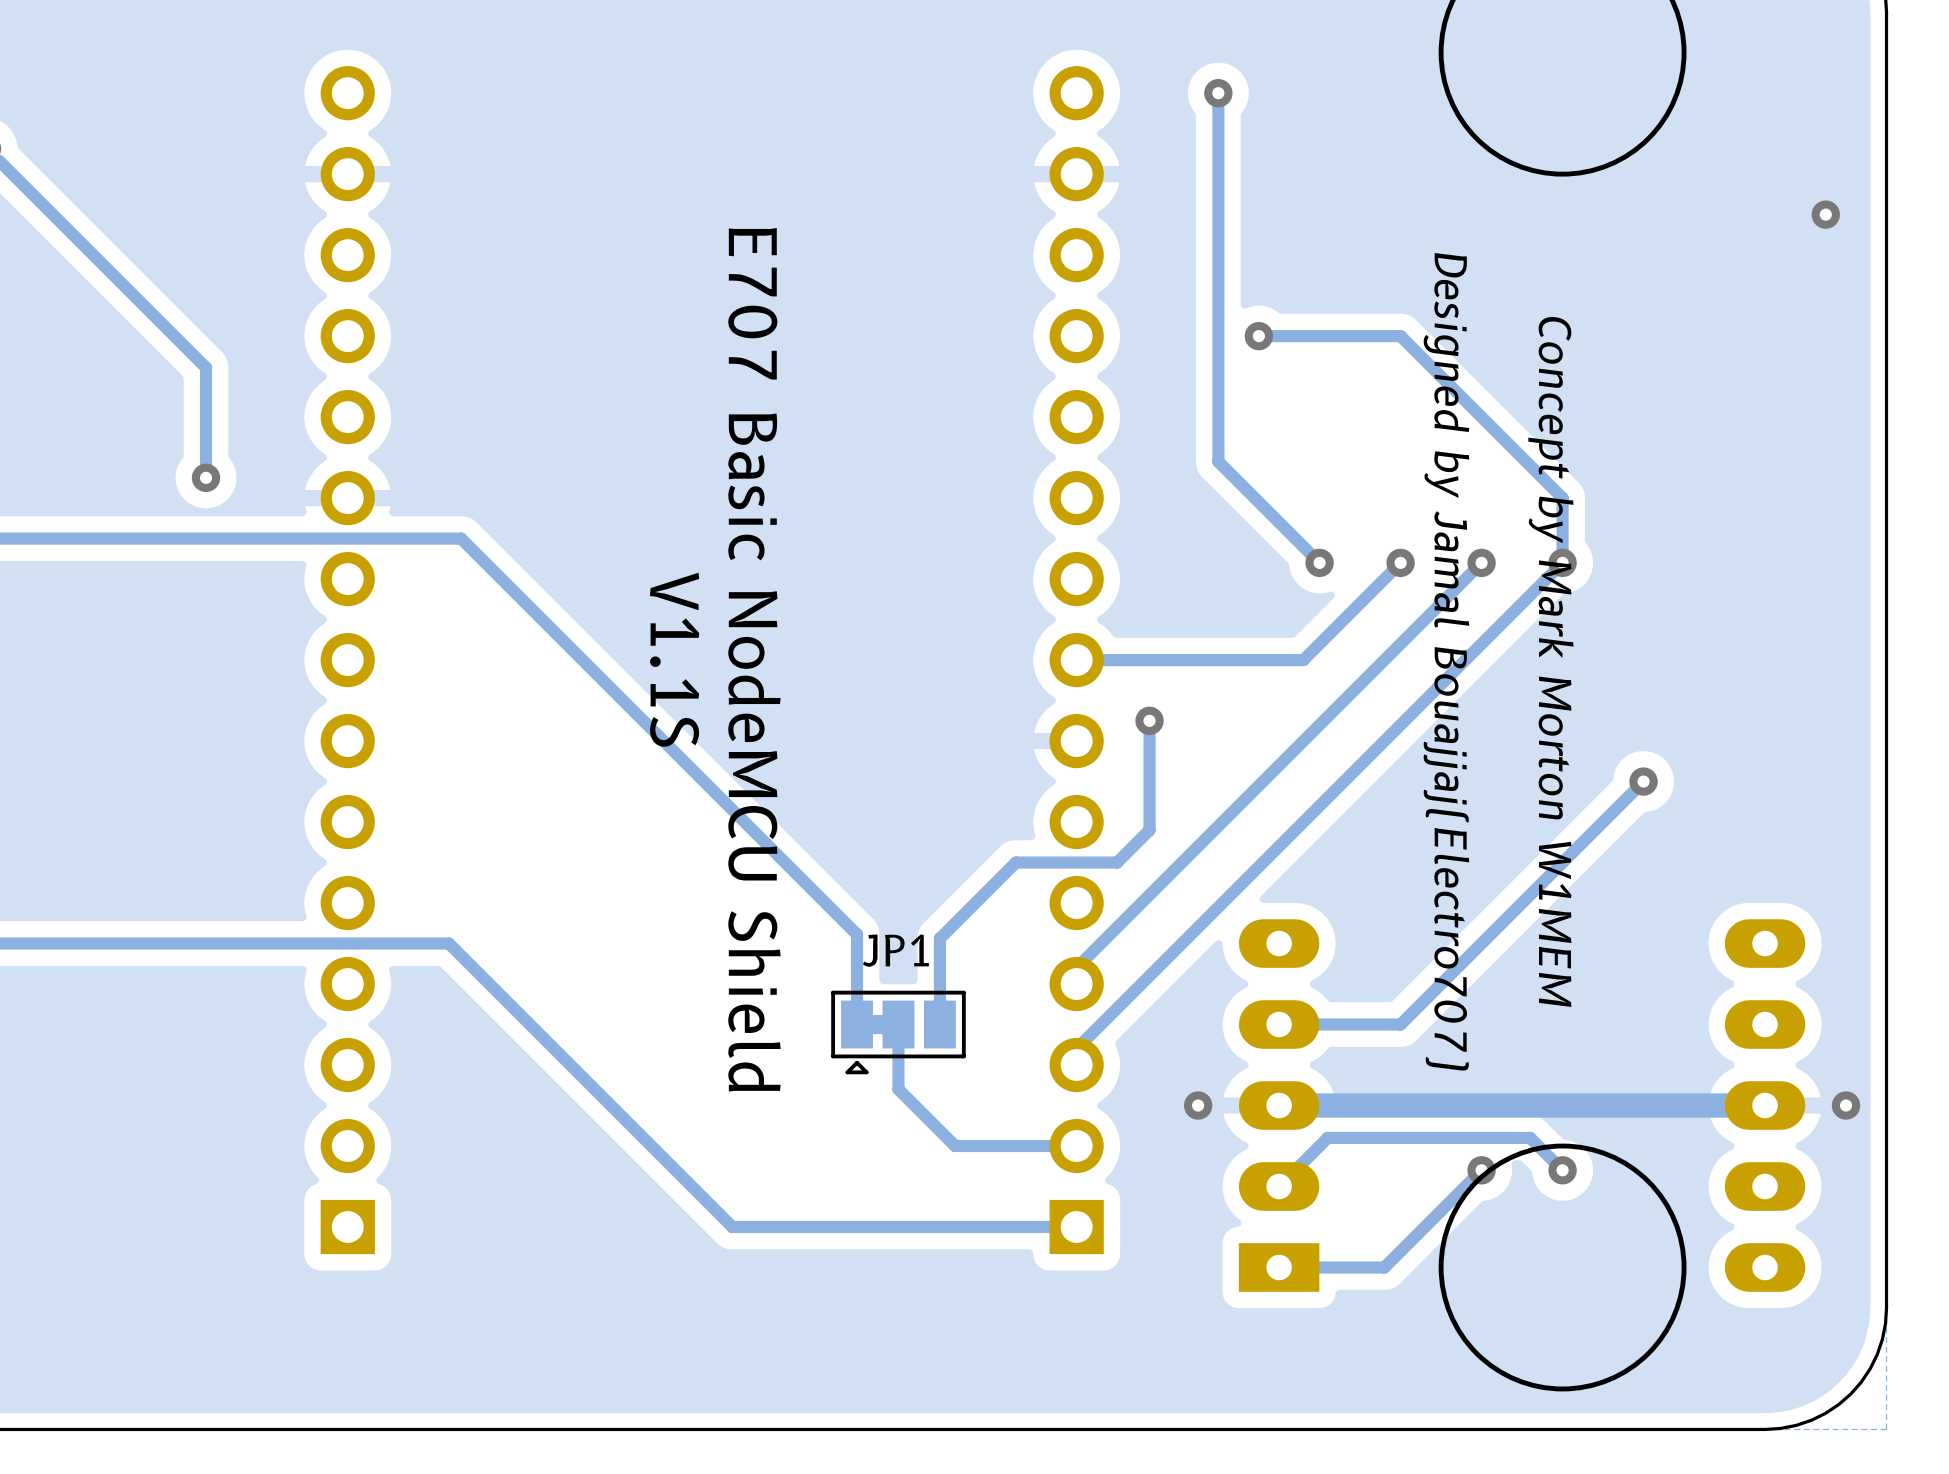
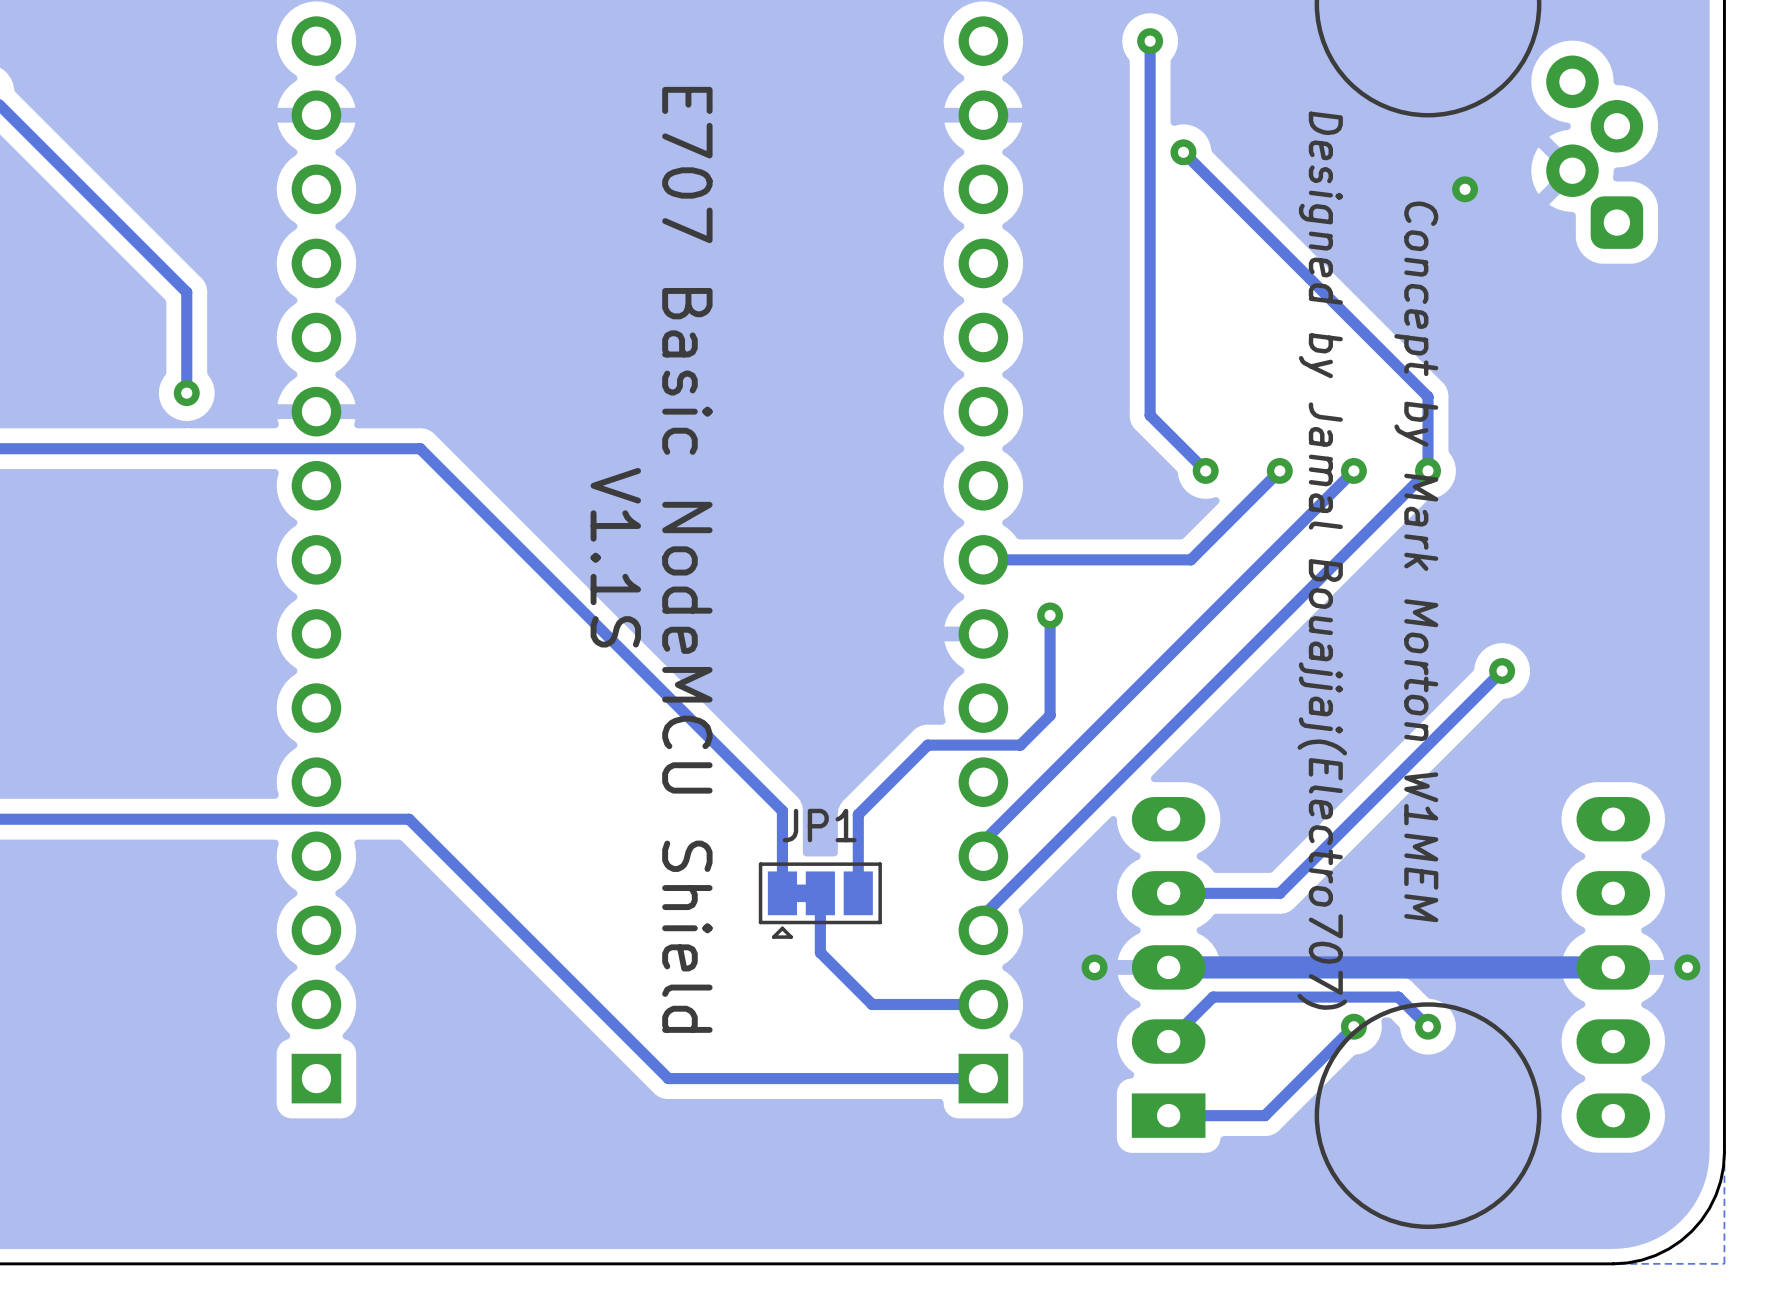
track: (1218, 93) (1218, 461) (1258, 502) -> (1150, 41) (1150, 415)
via position: (1218, 93) -> (1150, 41)
via: none -> (1183, 152)
part: none -> (1594, 152)
via: (1825, 214) -> none
via: none -> (1465, 189)
track: (1258, 336) (1400, 336) (1562, 498) -> (1183, 152) (1428, 396) (1428, 411)
via: (1258, 336) -> none

